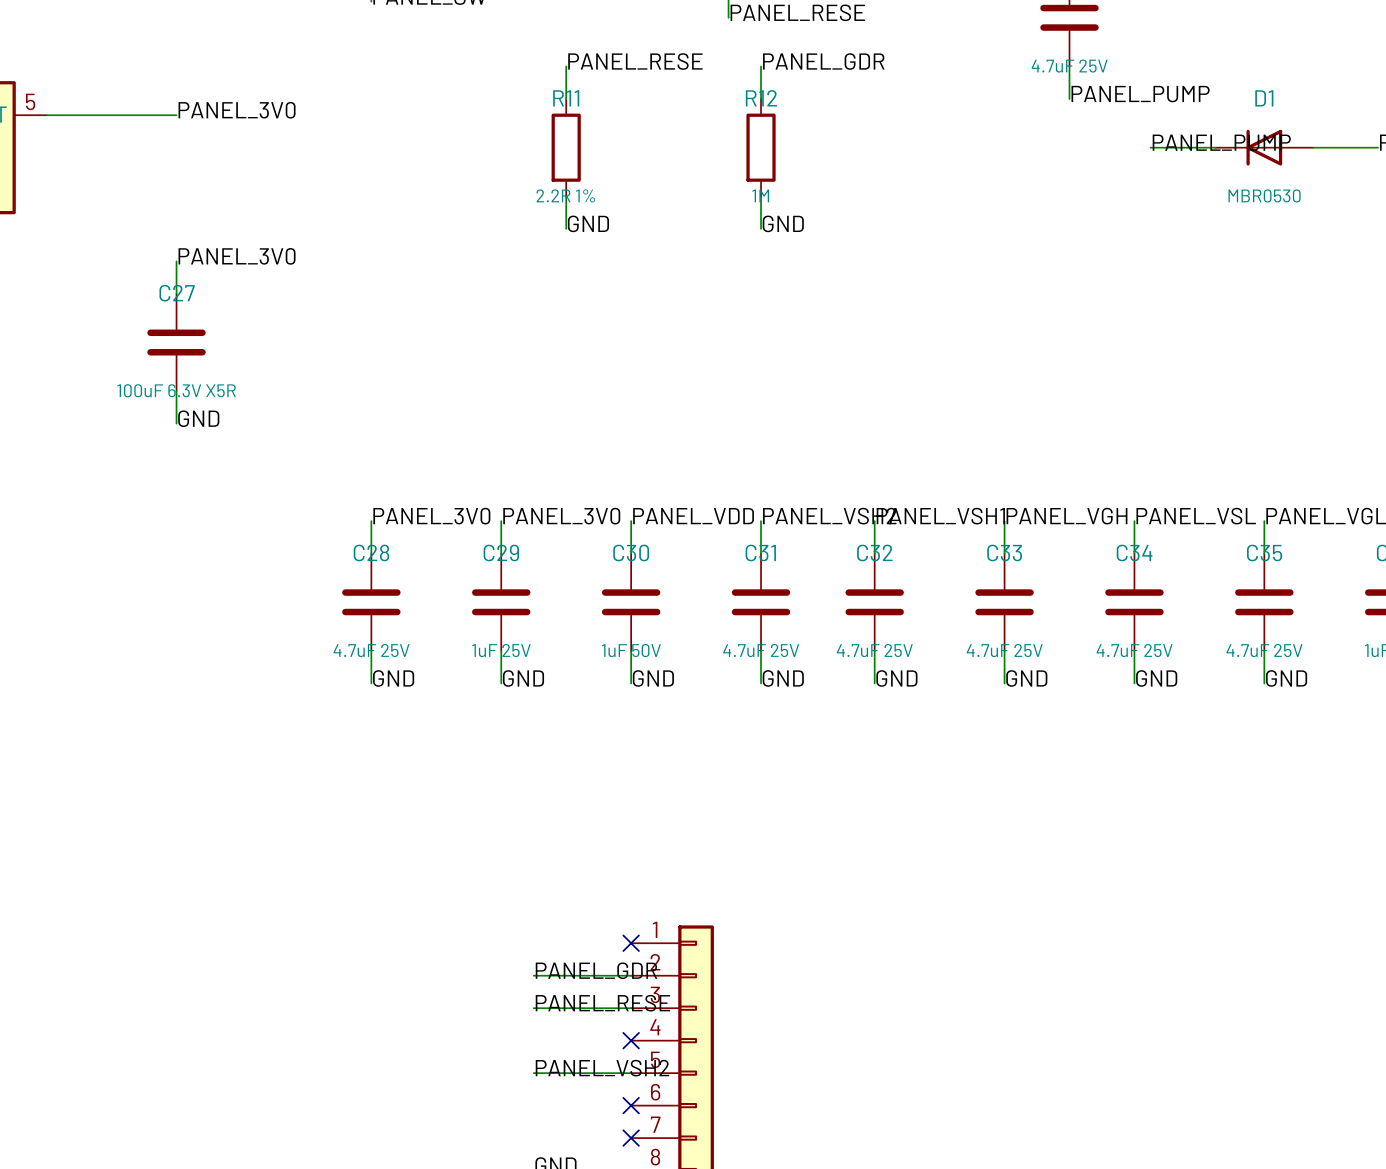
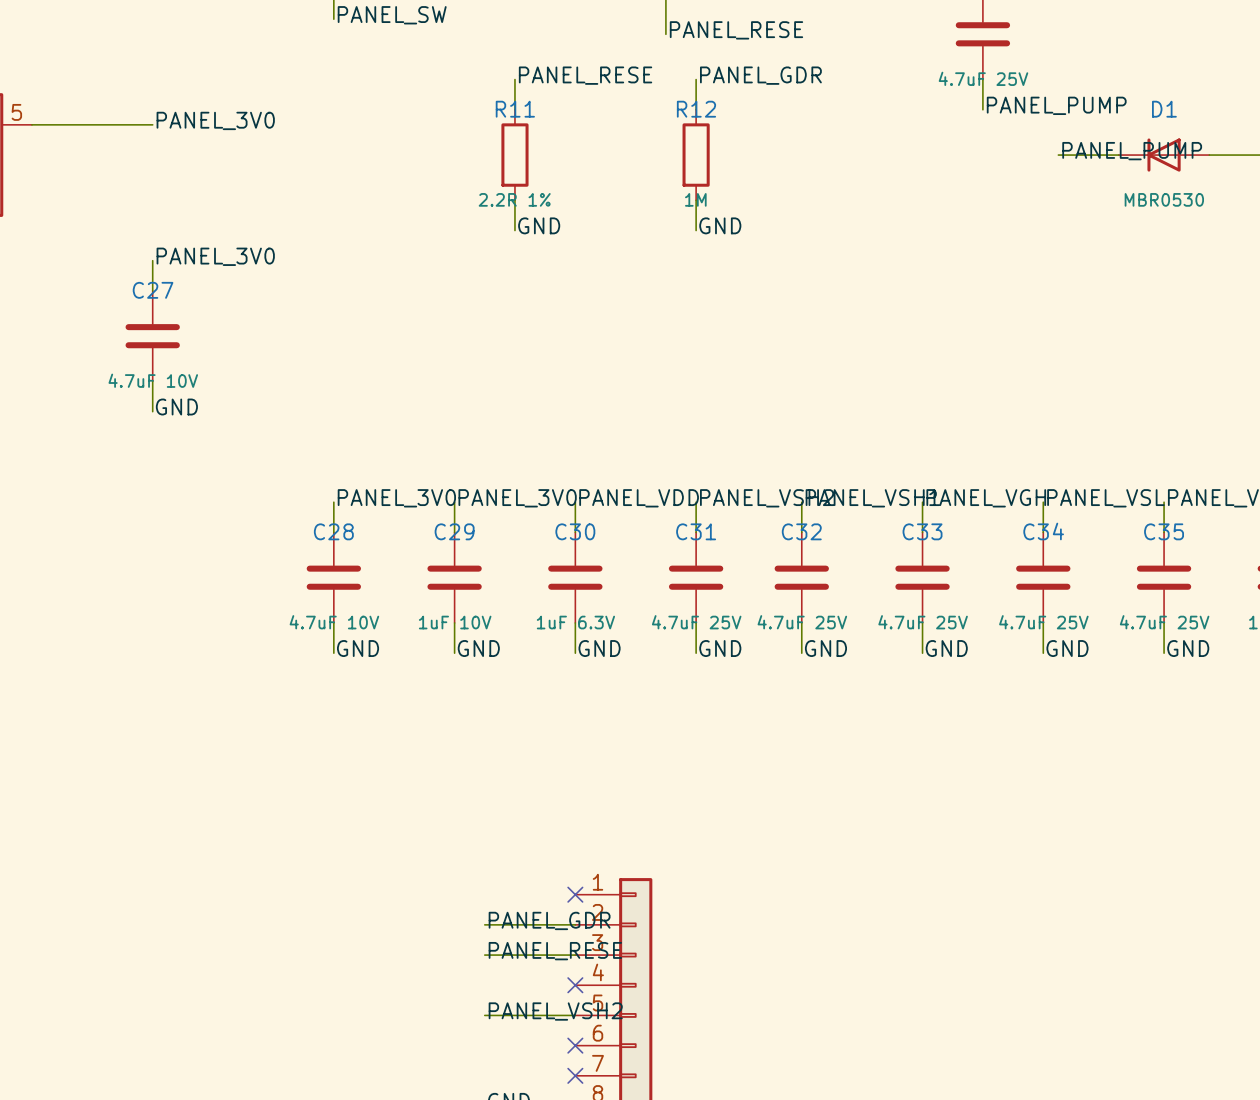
C27 value: 100uF 6.3V X5R (176, 390) -> 4.7uF 10V (153, 380)
C28 value: 4.7uF 25V (371, 650) -> 4.7uF 10V (334, 622)
C29 value: 1uF 25V (501, 650) -> 1uF 10V (455, 622)
C30 value: 1uF 50V (631, 650) -> 1uF 6.3V (575, 622)

